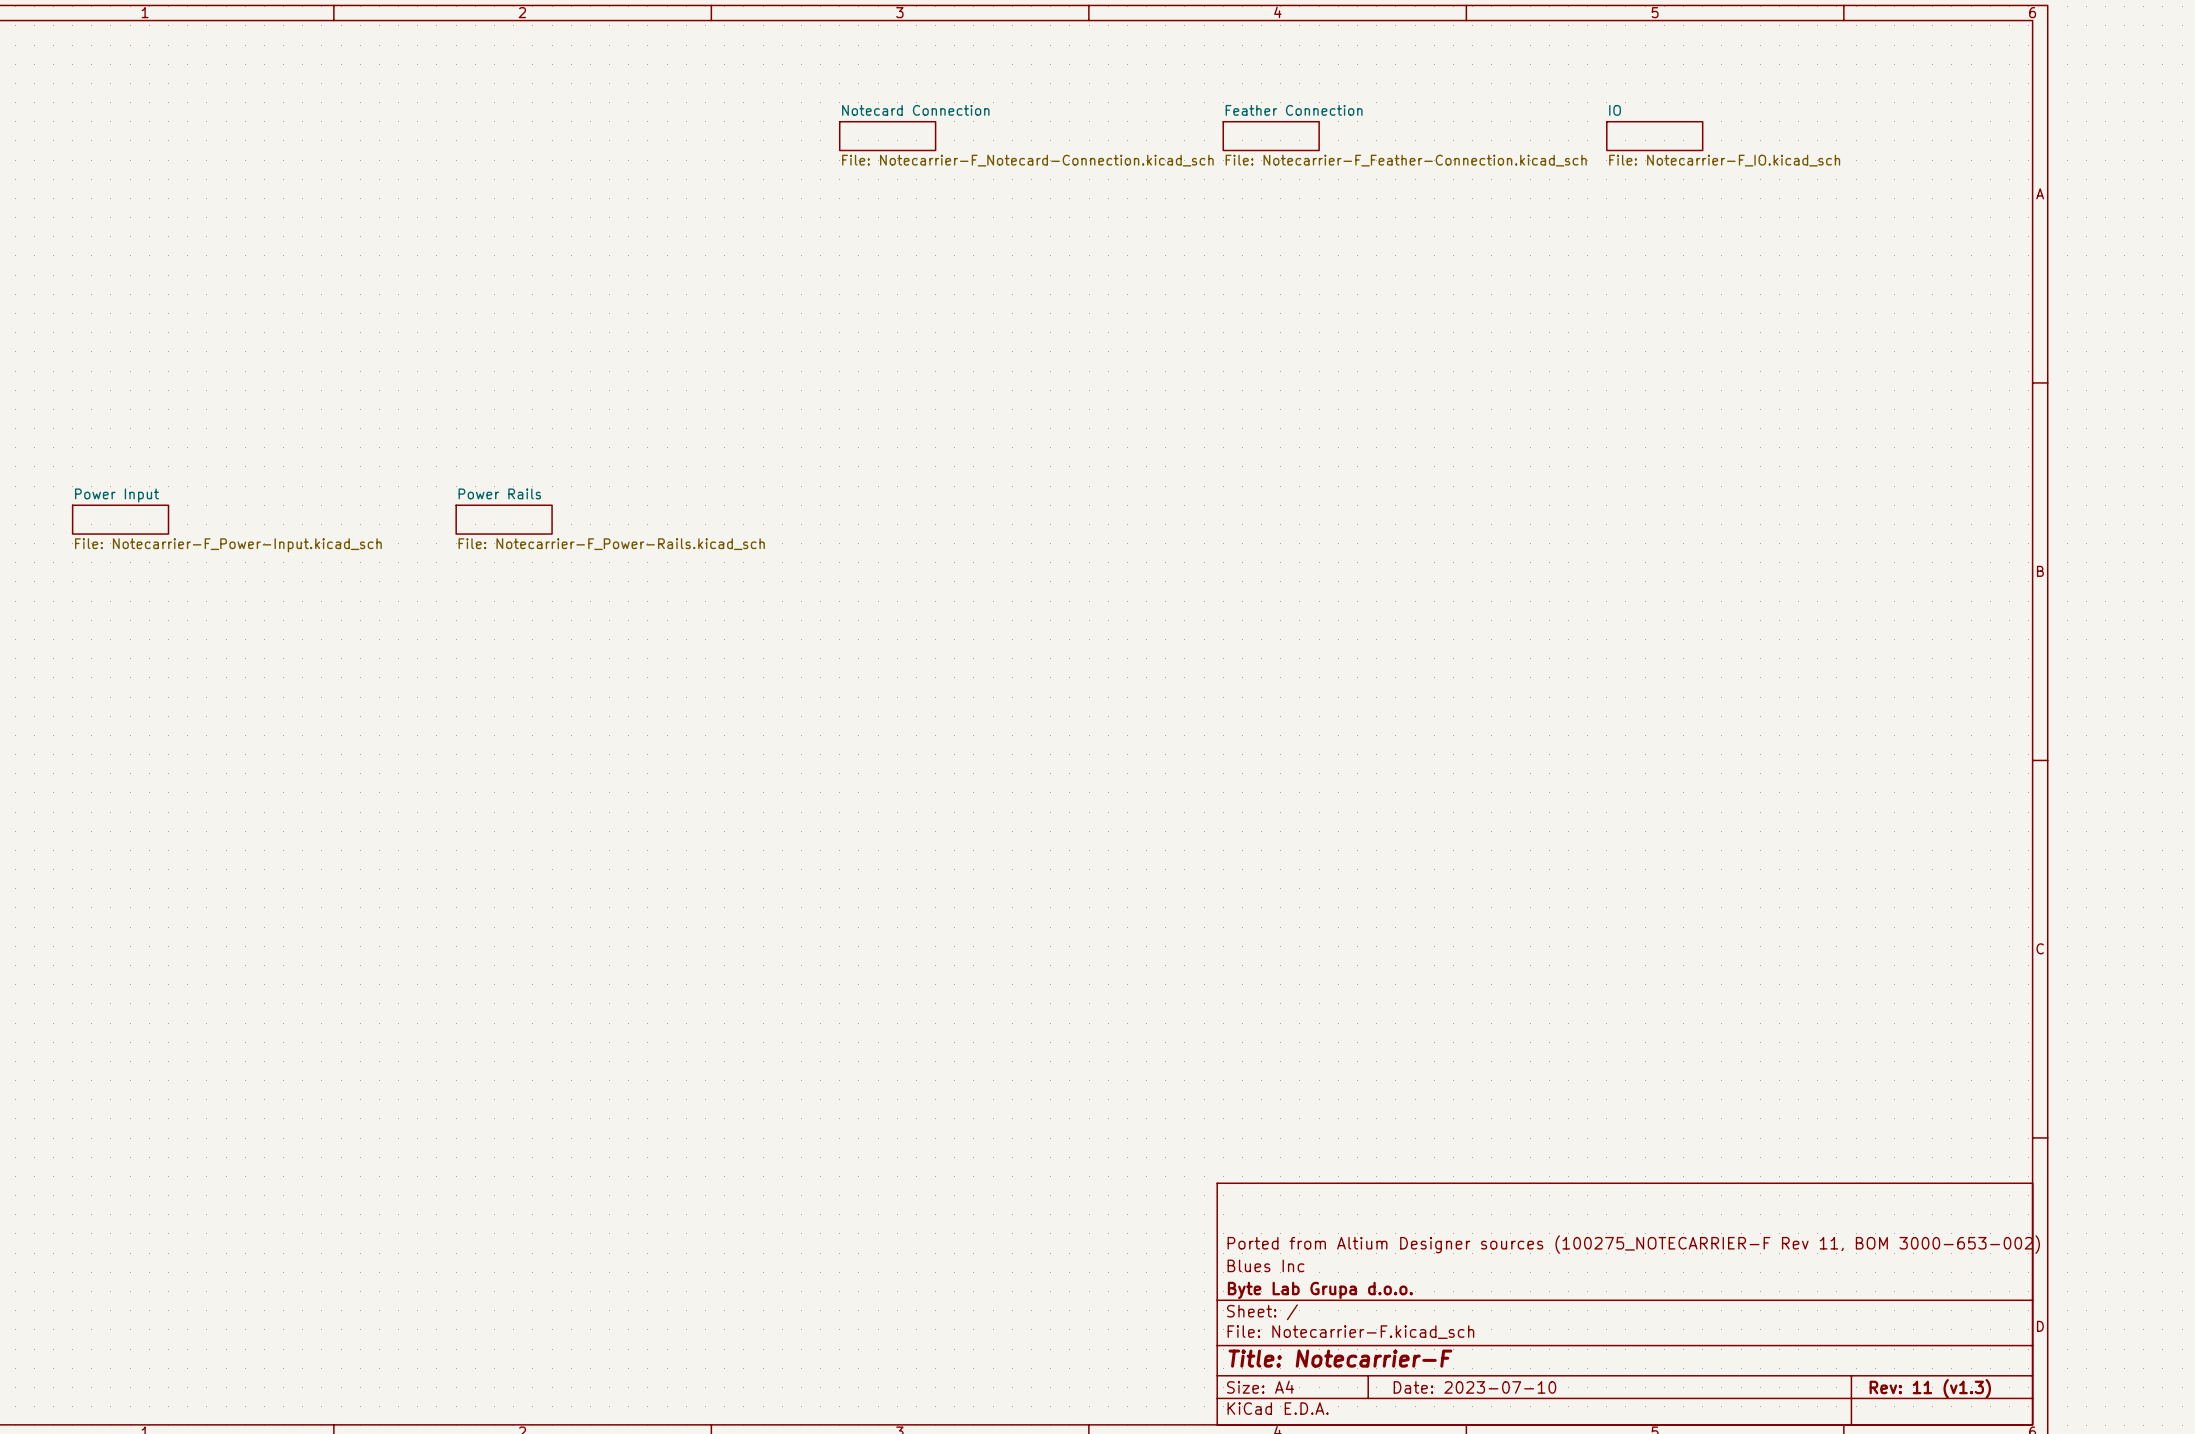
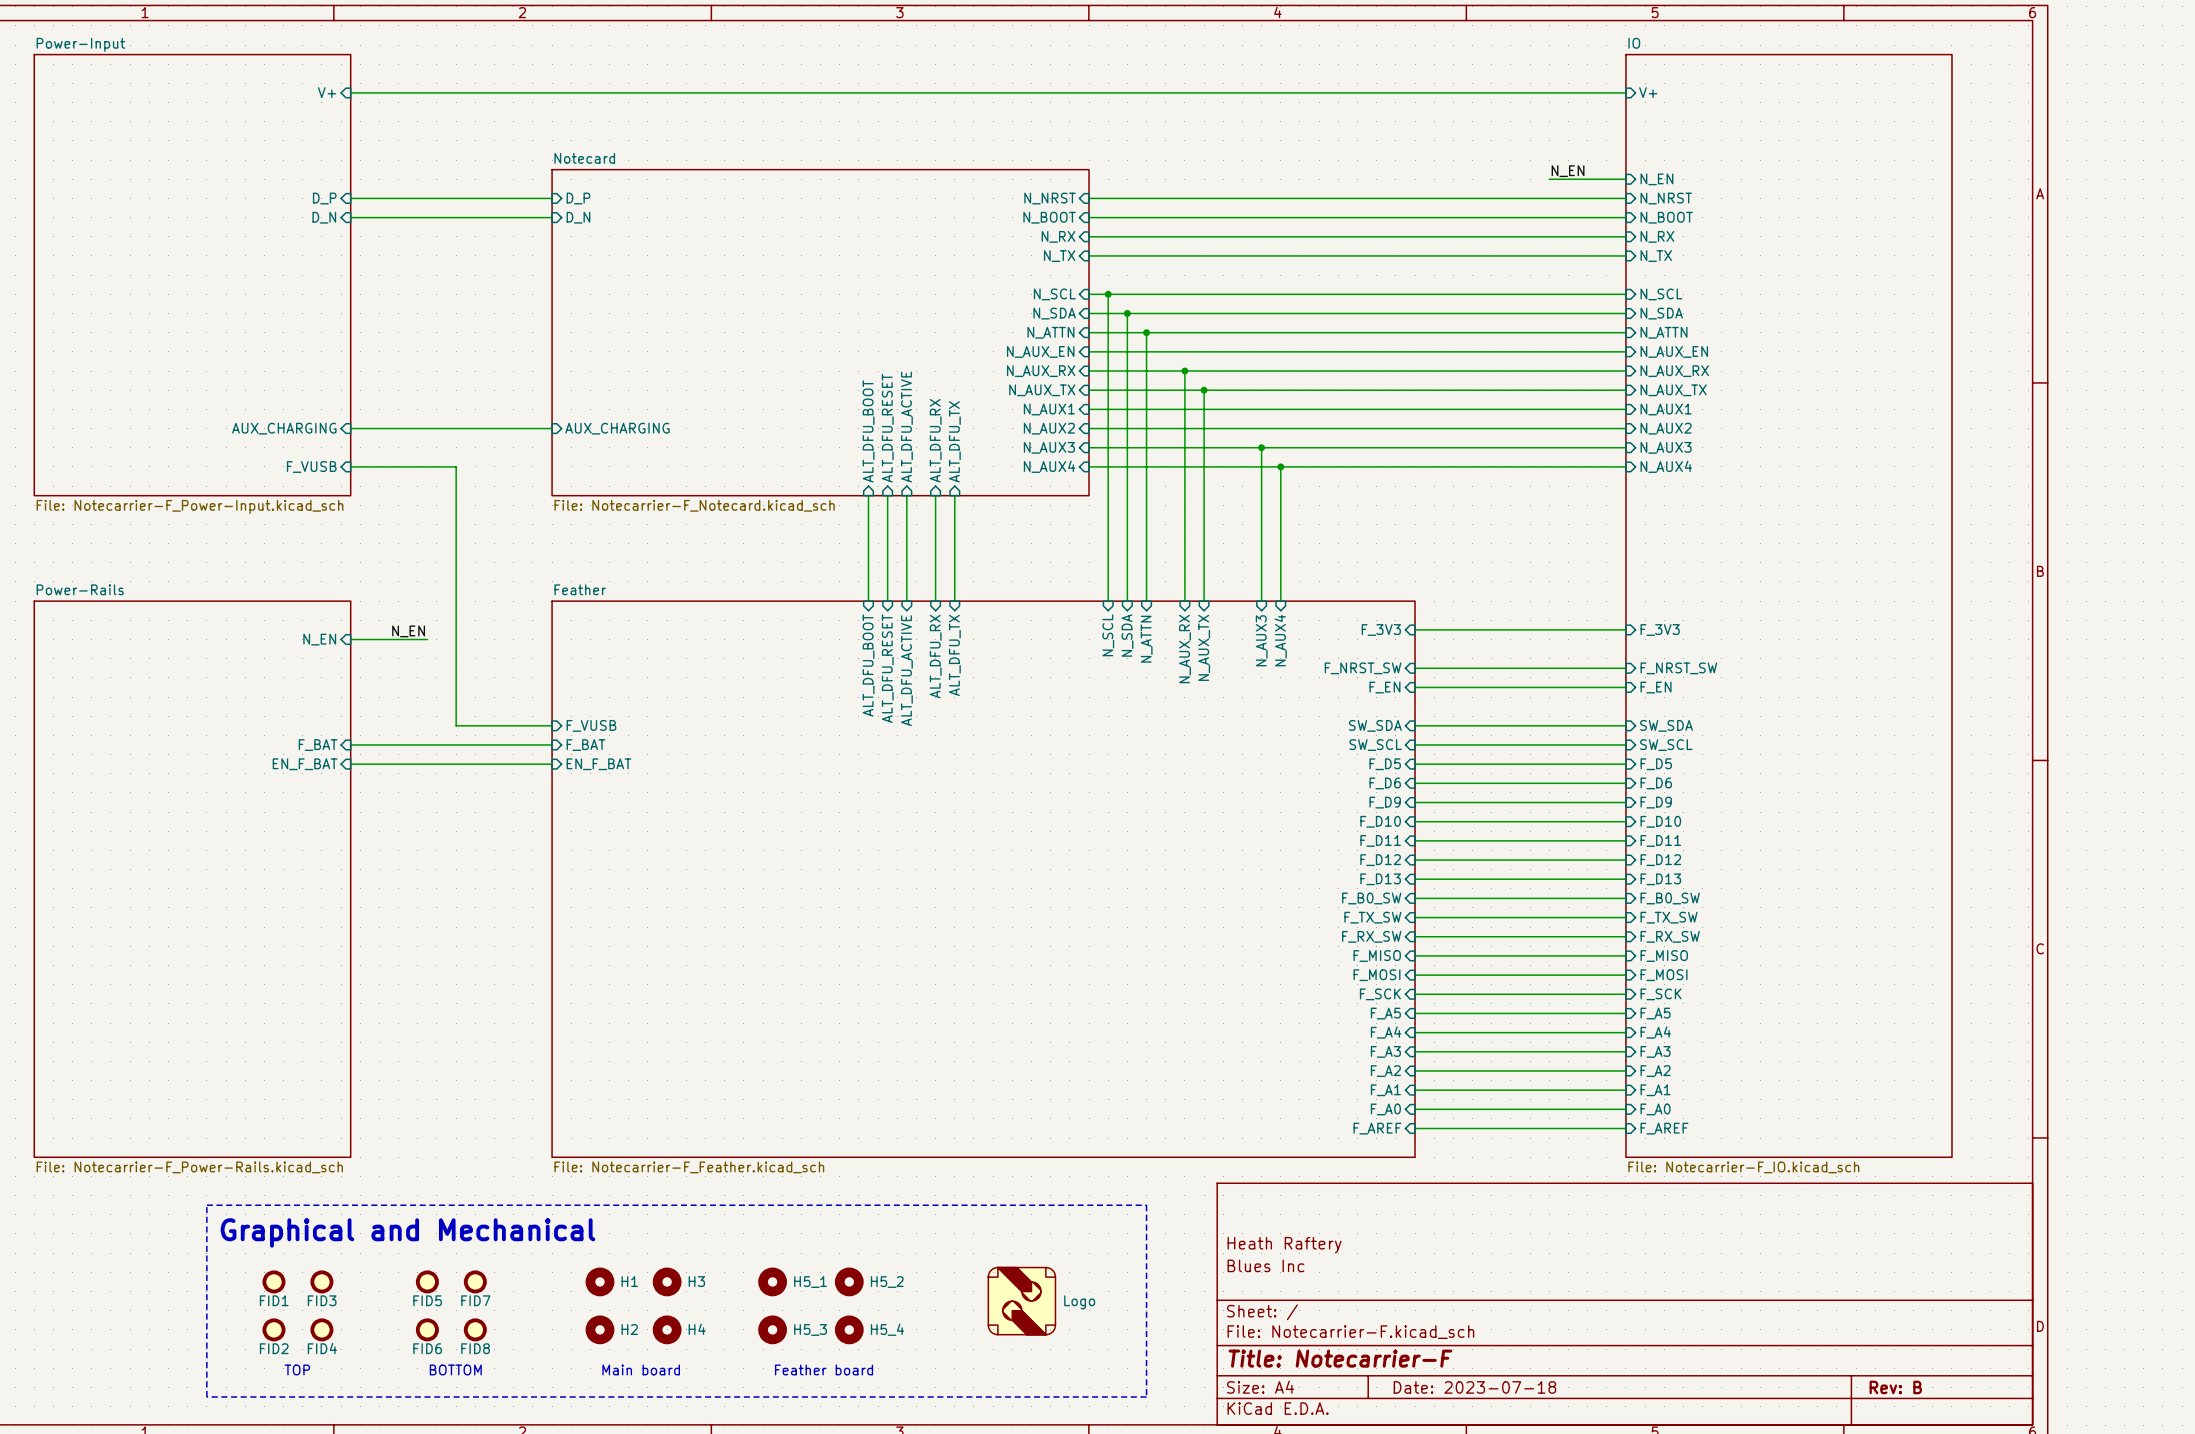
sheet pin: none -> V+ (327, 92)
wire: none -> (350, 92) (1625, 92)
sheet pin: none -> V+ (1648, 92)
sheet Notecard Connection: File: Notecarrier-F_Notecard-Connection.kicad_sch (887, 136) -> none
sheet Feather Connection: File: Notecarrier-F_Feather-Connection.kicad_sch (1271, 136) -> none
sheet IO: File: Notecarrier-F_IO.kicad_sch (1654, 136) -> none
label: none -> N_EN (1568, 171)
wire: none -> (1549, 179) (1625, 179)
sheet pin: none -> N_EN (1656, 179)
sheet pin: none -> D_P (324, 198)
wire: none -> (350, 198) (552, 198)
sheet pin: none -> D_P (578, 198)
sheet pin: none -> N_NRST (1050, 198)
wire: none -> (1089, 198) (1625, 198)
sheet pin: none -> N_NRST (1666, 198)
sheet pin: none -> D_N (324, 217)
wire: none -> (350, 217) (552, 217)
sheet pin: none -> D_N (578, 217)
sheet pin: none -> N_BOOT (1049, 217)
wire: none -> (1089, 217) (1625, 217)
sheet pin: none -> N_BOOT (1666, 217)
sheet pin: none -> N_RX (1058, 236)
wire: none -> (1089, 236) (1625, 236)
sheet pin: none -> N_RX (1657, 236)
wire: none -> (1089, 255) (1625, 255)
sheet pin: none -> N_TX (1059, 256)
sheet pin: none -> N_TX (1656, 256)
sheet Power-Input: none -> File: Notecarrier-F_Power-Input.kicad_sch (192, 275)
sheet pin: none -> N_SCL (1054, 294)
wire: none -> (1089, 294) (1625, 294)
wire: none -> (1108, 294) (1108, 601)
junction: none -> (1108, 294)
sheet pin: none -> N_SCL (1661, 294)
sheet pin: none -> N_SDA (1054, 313)
wire: none -> (1089, 313) (1625, 313)
wire: none -> (1127, 313) (1127, 601)
junction: none -> (1127, 313)
sheet pin: none -> N_SDA (1661, 313)
sheet Notecard: none -> File: Notecarrier-F_Notecard.kicad_sch (820, 332)
sheet pin: none -> N_ATTN (1050, 332)
wire: none -> (1089, 332) (1625, 332)
wire: none -> (1146, 332) (1146, 601)
junction: none -> (1146, 332)
sheet pin: none -> N_ATTN (1664, 332)
sheet pin: none -> N_AUX_EN (1040, 351)
wire: none -> (1089, 351) (1625, 351)
sheet pin: none -> N_AUX_EN (1674, 351)
sheet pin: none -> N_AUX_RX (1041, 371)
wire: none -> (1089, 371) (1625, 371)
wire: none -> (1184, 371) (1184, 601)
junction: none -> (1184, 371)
sheet pin: none -> N_AUX_RX (1674, 371)
sheet pin: none -> N_AUX_TX (1042, 390)
wire: none -> (1089, 390) (1625, 390)
wire: none -> (1204, 390) (1204, 601)
junction: none -> (1204, 390)
sheet pin: none -> N_AUX_TX (1673, 390)
sheet pin: none -> N_AUX1 (1049, 409)
wire: none -> (1089, 409) (1625, 409)
sheet pin: none -> N_AUX1 (1666, 409)
sheet pin: none -> ALT_DFU_ACTIVE (906, 427)
sheet pin: none -> AUX_CHARGING (284, 428)
wire: none -> (350, 428) (552, 428)
sheet pin: none -> AUX_CHARGING (617, 428)
sheet pin: none -> ALT_DFU_RESET (887, 428)
sheet pin: none -> N_AUX2 (1049, 428)
wire: none -> (1089, 428) (1625, 428)
sheet pin: none -> N_AUX2 (1666, 428)
sheet pin: none -> ALT_DFU_BOOT (868, 431)
sheet pin: none -> ALT_DFU_RX (935, 440)
sheet pin: none -> ALT_DFU_TX (954, 441)
sheet pin: none -> N_AUX3 (1049, 447)
wire: none -> (1089, 447) (1625, 447)
wire: none -> (1261, 447) (1261, 601)
junction: none -> (1261, 447)
sheet pin: none -> N_AUX3 (1666, 447)
wire: none -> (350, 466) (456, 466) (456, 725) (552, 725)
sheet pin: none -> N_AUX4 (1049, 466)
wire: none -> (1089, 466) (1625, 466)
wire: none -> (1280, 466) (1280, 601)
junction: none -> (1280, 466)
sheet pin: none -> N_AUX4 (1666, 466)
sheet pin: none -> F_VUSB (311, 467)
wire: none -> (868, 495) (868, 601)
wire: none -> (887, 495) (887, 601)
wire: none -> (906, 495) (906, 601)
wire: none -> (935, 495) (935, 601)
wire: none -> (954, 495) (954, 601)
sheet Power Input: File: Notecarrier-F_Power-Input.kicad_sch (120, 519) -> none
sheet Power Rails: File: Notecarrier-F_Power-Rails.kicad_sch (504, 519) -> none
sheet IO: none -> File: Notecarrier-F_IO.kicad_sch (1788, 605)
wire: none -> (1415, 629) (1625, 629)
sheet pin: none -> F_3V3 (1381, 630)
sheet pin: none -> F_3V3 (1660, 630)
label: none -> N_EN (408, 631)
sheet pin: none -> N_SCL (1108, 635)
sheet pin: none -> N_SDA (1127, 635)
sheet pin: none -> N_EN (319, 639)
wire: none -> (350, 639) (427, 639)
sheet pin: none -> N_ATTN (1146, 639)
sheet pin: none -> N_AUX3 (1261, 640)
sheet pin: none -> N_AUX4 (1280, 640)
sheet pin: none -> N_AUX_TX (1204, 647)
sheet pin: none -> N_AUX_RX (1184, 649)
sheet pin: none -> ALT_DFU_TX (954, 655)
sheet pin: none -> ALT_DFU_RX (935, 656)
sheet pin: none -> ALT_DFU_BOOT (868, 665)
sheet pin: none -> ALT_DFU_RESET (887, 668)
sheet pin: none -> F_NRST_SW (1363, 668)
wire: none -> (1415, 668) (1625, 668)
sheet pin: none -> F_NRST_SW (1678, 668)
sheet pin: none -> ALT_DFU_ACTIVE (906, 670)
sheet pin: none -> F_EN (1384, 687)
wire: none -> (1415, 687) (1625, 687)
sheet pin: none -> F_EN (1656, 687)
sheet pin: none -> F_VUSB (591, 725)
sheet pin: none -> SW_SDA (1375, 725)
wire: none -> (1415, 725) (1625, 725)
sheet pin: none -> SW_SDA (1666, 725)
wire: none -> (350, 744) (552, 744)
wire: none -> (1415, 744) (1625, 744)
sheet pin: none -> F_BAT (318, 745)
sheet pin: none -> F_BAT (585, 745)
sheet pin: none -> SW_SCL (1375, 745)
sheet pin: none -> SW_SCL (1666, 745)
sheet pin: none -> EN_F_BAT (305, 764)
wire: none -> (350, 764) (552, 764)
sheet pin: none -> EN_F_BAT (599, 764)
sheet pin: none -> F_D5 (1385, 764)
wire: none -> (1415, 764) (1625, 764)
sheet pin: none -> F_D5 (1656, 764)
sheet pin: none -> F_D6 (1385, 783)
wire: none -> (1415, 783) (1625, 783)
sheet pin: none -> F_D6 (1656, 783)
sheet pin: none -> F_D9 (1385, 802)
wire: none -> (1415, 802) (1625, 802)
sheet pin: none -> F_D9 (1656, 802)
sheet pin: none -> F_D10 (1380, 821)
wire: none -> (1415, 821) (1625, 821)
sheet pin: none -> F_D10 (1660, 821)
sheet pin: none -> F_D11 (1380, 840)
wire: none -> (1415, 840) (1625, 840)
sheet pin: none -> F_D11 (1660, 840)
sheet pin: none -> F_D12 (1380, 860)
wire: none -> (1415, 860) (1625, 860)
sheet pin: none -> F_D12 (1660, 860)
sheet Power-Rails: none -> File: Notecarrier-F_Power-Rails.kicad_sch (192, 879)
sheet Feather: none -> File: Notecarrier-F_Feather.kicad_sch (983, 879)
sheet pin: none -> F_D13 (1380, 879)
wire: none -> (1415, 879) (1625, 879)
sheet pin: none -> F_D13 (1660, 879)
sheet pin: none -> F_B0_SW (1371, 898)
wire: none -> (1415, 898) (1625, 898)
sheet pin: none -> F_B0_SW (1670, 898)
sheet pin: none -> F_TX_SW (1372, 917)
wire: none -> (1415, 917) (1625, 917)
sheet pin: none -> F_TX_SW (1669, 917)
sheet pin: none -> F_RX_SW (1371, 936)
wire: none -> (1415, 936) (1625, 936)
sheet pin: none -> F_RX_SW (1670, 936)
wire: none -> (1415, 955) (1625, 955)
sheet pin: none -> F_MISO (1377, 956)
sheet pin: none -> F_MISO (1664, 956)
sheet pin: none -> F_MOSI (1376, 975)
wire: none -> (1415, 975) (1625, 975)
sheet pin: none -> F_MOSI (1664, 975)
sheet pin: none -> F_SCK (1380, 994)
wire: none -> (1415, 994) (1625, 994)
sheet pin: none -> F_SCK (1661, 994)
sheet pin: none -> F_A5 (1385, 1013)
wire: none -> (1415, 1013) (1625, 1013)
sheet pin: none -> F_A5 (1655, 1013)
sheet pin: none -> F_A4 (1386, 1032)
wire: none -> (1415, 1032) (1625, 1032)
sheet pin: none -> F_A4 (1655, 1032)
sheet pin: none -> F_A3 (1385, 1051)
wire: none -> (1415, 1051) (1625, 1051)
sheet pin: none -> F_A3 (1655, 1051)
wire: none -> (1415, 1070) (1625, 1070)
sheet pin: none -> F_A2 (1385, 1071)
sheet pin: none -> F_A2 (1655, 1071)
sheet pin: none -> F_A1 (1385, 1090)
wire: none -> (1415, 1090) (1625, 1090)
sheet pin: none -> F_A1 (1655, 1090)
sheet pin: none -> F_A0 (1385, 1109)
wire: none -> (1415, 1109) (1625, 1109)
sheet pin: none -> F_A0 (1655, 1109)
sheet pin: none -> F_AREF (1377, 1128)
wire: none -> (1415, 1128) (1625, 1128)
sheet pin: none -> F_AREF (1664, 1128)
line: none -> (206, 1205) (1146, 1205) (1146, 1397) (206, 1397) (206, 1205)
text: none -> Graphical and Mechanical (408, 1232)
title block: Ported from Altium Designer sources (100275_NOTECARRIER-F Rev 11, BOM 3000-653-002) (1633, 1244) -> Heath Raftery (1284, 1245)
FID1: none -> (273, 1281)
FID3: none -> (321, 1281)
FID5: none -> (427, 1281)
FID7: none -> (475, 1281)
H1: none -> (599, 1281)
H3: none -> (667, 1281)
H5_1: none -> (772, 1281)
H5_2: none -> (849, 1281)
title block: Byte Lab Grupa d.o.o. (1320, 1290) -> none
part: none -> Logo (1021, 1301)
FID2: none -> (273, 1329)
FID4: none -> (321, 1329)
FID6: none -> (427, 1329)
FID8: none -> (475, 1329)
H2: none -> (599, 1329)
H4: none -> (667, 1329)
H5_3: none -> (772, 1329)
H5_4: none -> (849, 1329)
text: none -> TOP (297, 1369)
text: none -> BOTTOM (455, 1369)
text: none -> Main board (641, 1369)
text: none -> Feather board (824, 1369)
title block: Date: 2023-07-10 (1474, 1387) -> Date: 2023-07-18 (1474, 1387)
title block: Rev: 11 (v1.3) (1930, 1388) -> Rev: B (1895, 1387)

